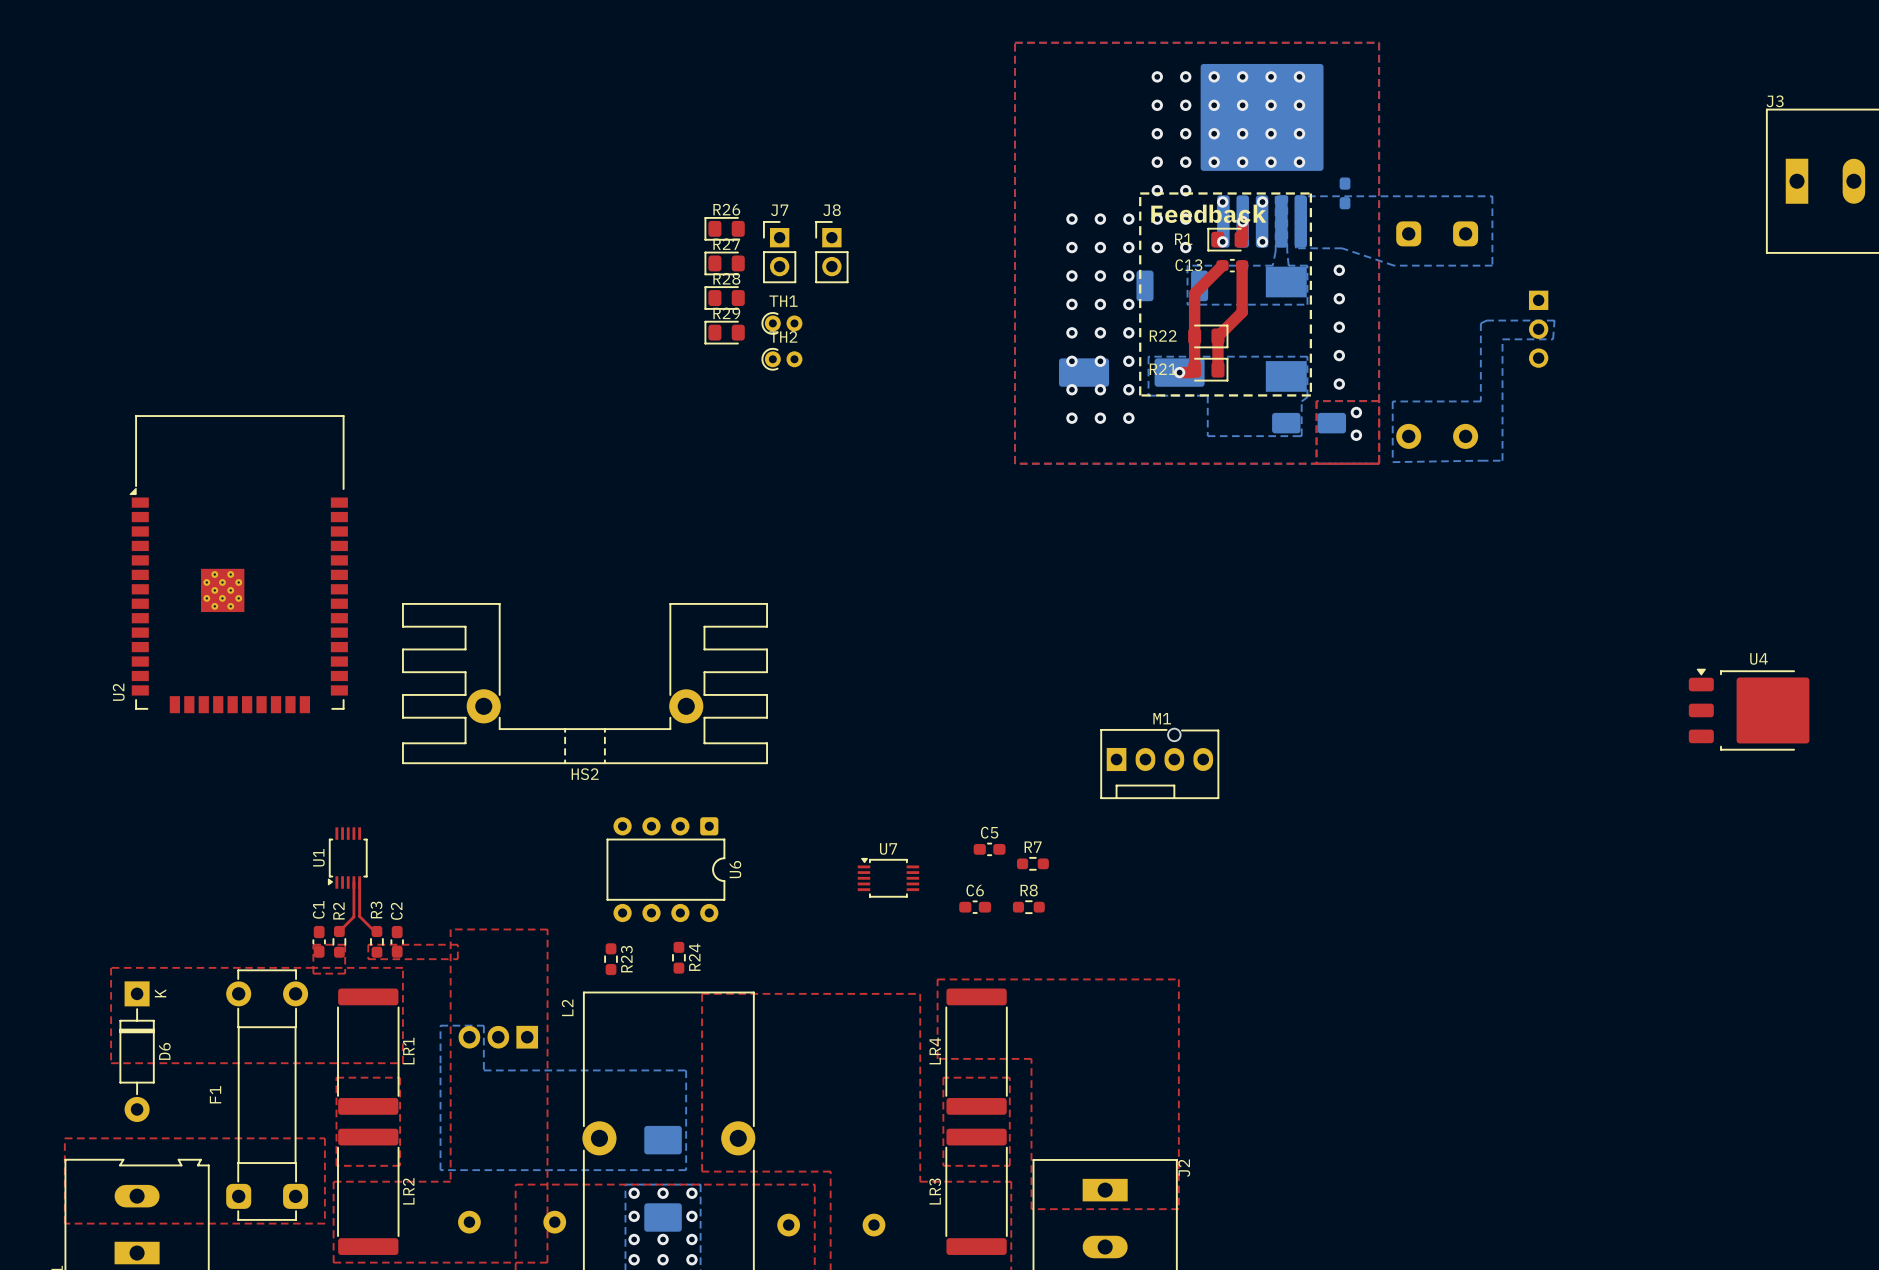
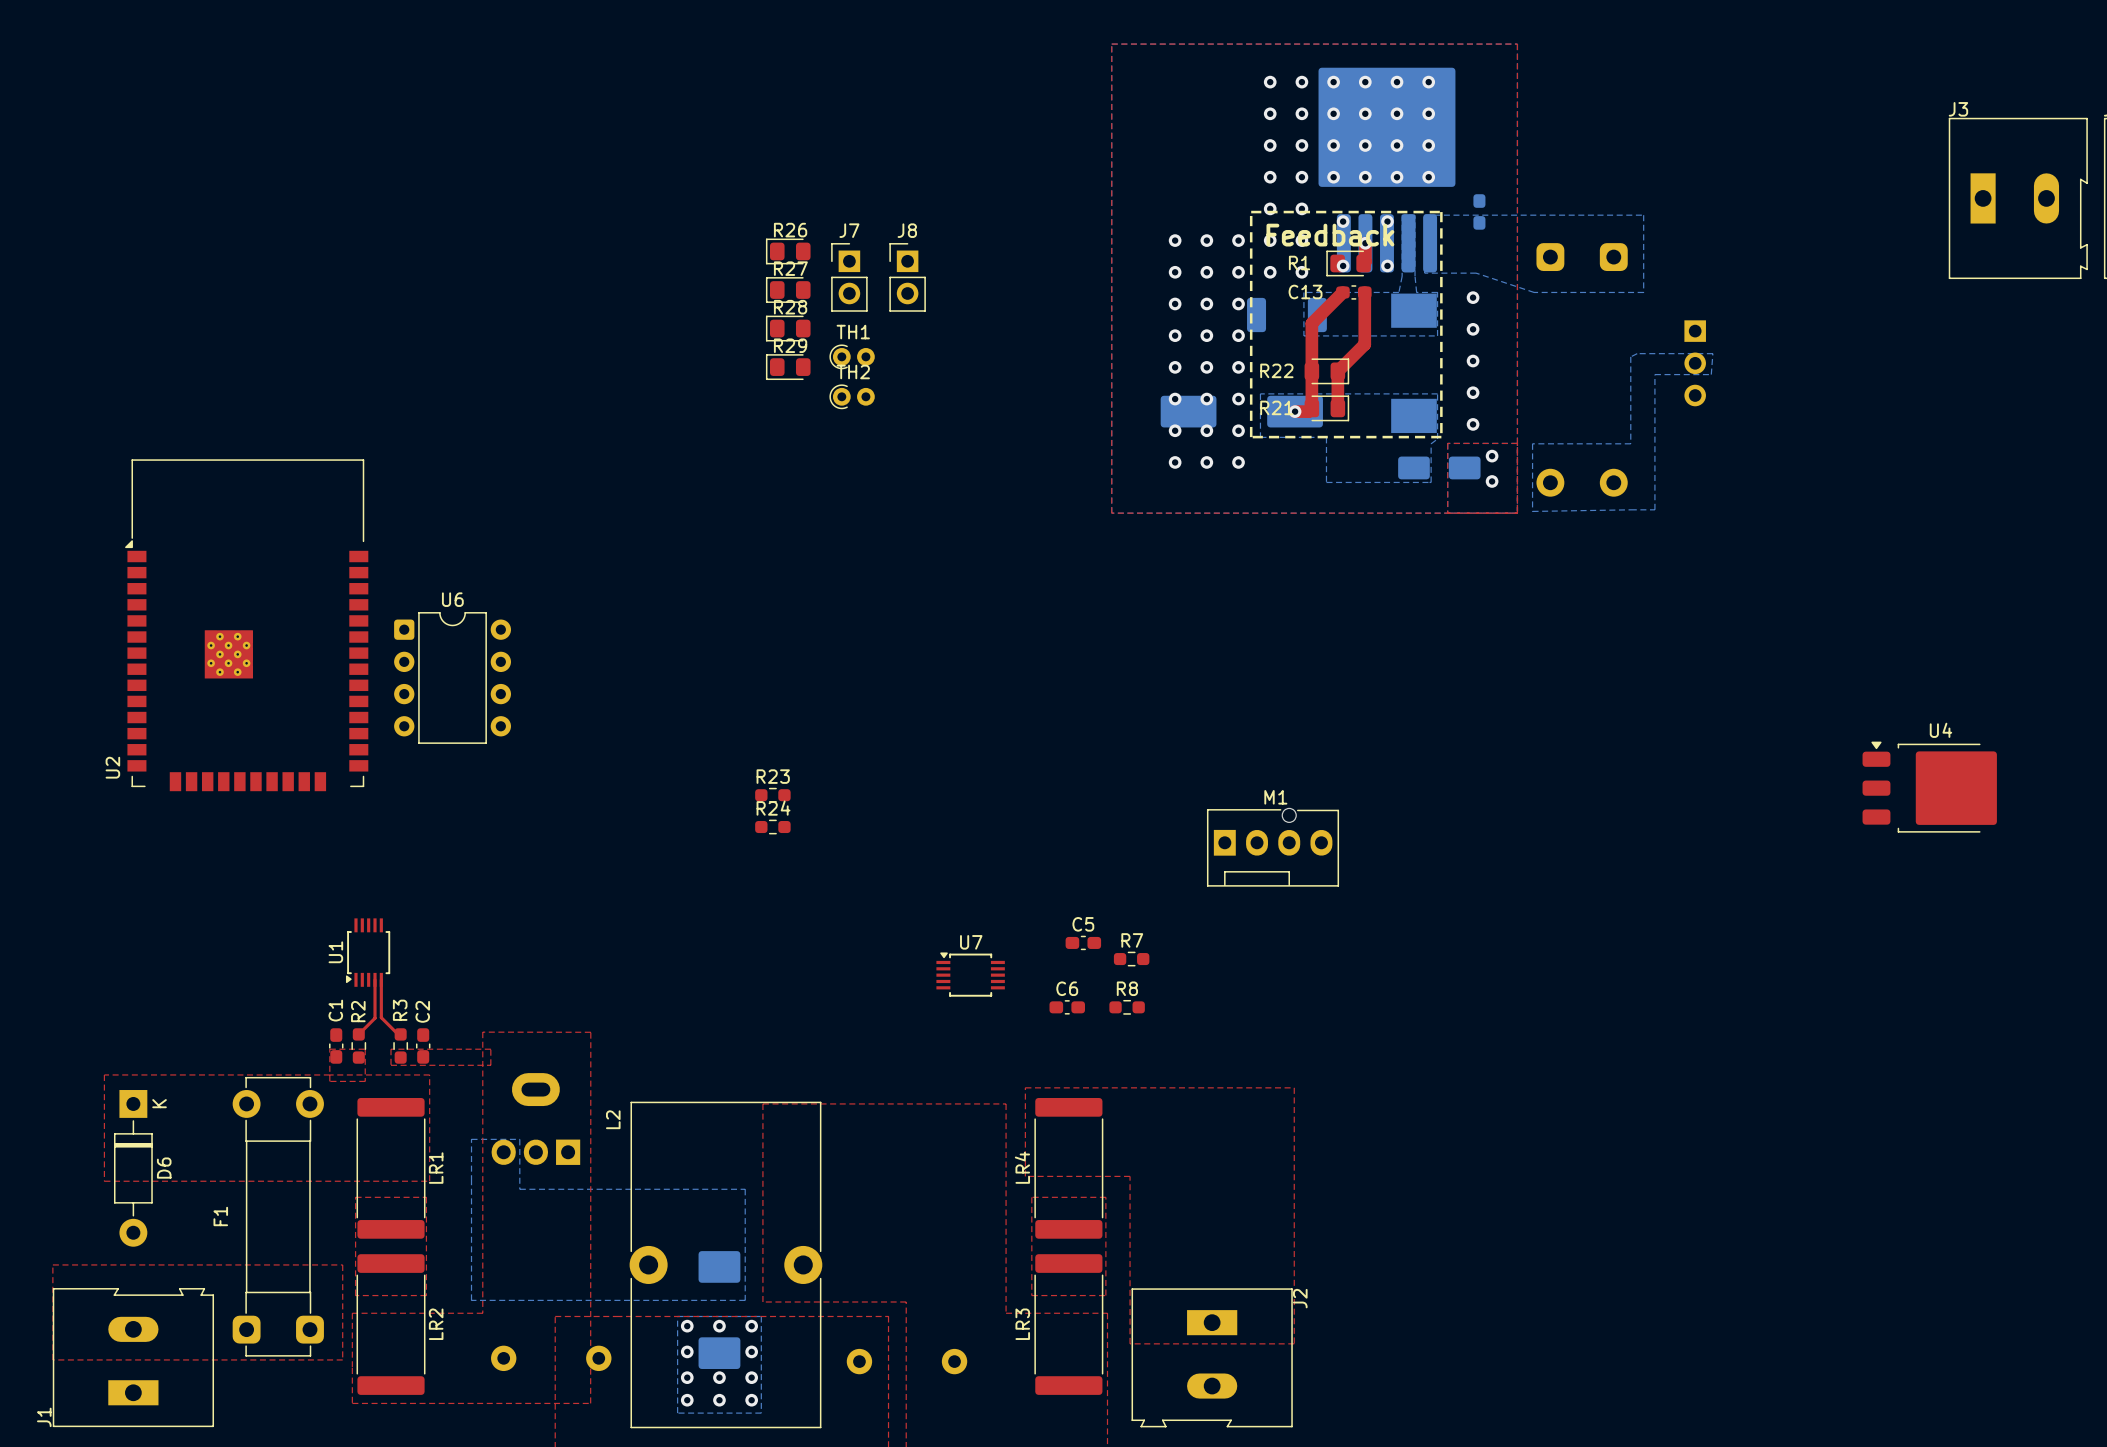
HS2: (585, 683) -> none
U6 rotation: 0° (665, 869) -> 90° counterclockwise (452, 677)
U6 position: (665, 869) -> (452, 677)
R24 rotation: 0° (678, 957) -> 90° clockwise (772, 827)
R24 position: (678, 957) -> (772, 827)
R24 name position: R24 (694, 957) -> R24 (773, 808)
R23 rotation: 0° (611, 959) -> 90° clockwise (772, 795)
R23 position: (611, 959) -> (772, 795)
R23 name position: R23 (626, 959) -> R23 (773, 776)
part: none -> (535, 1089)

